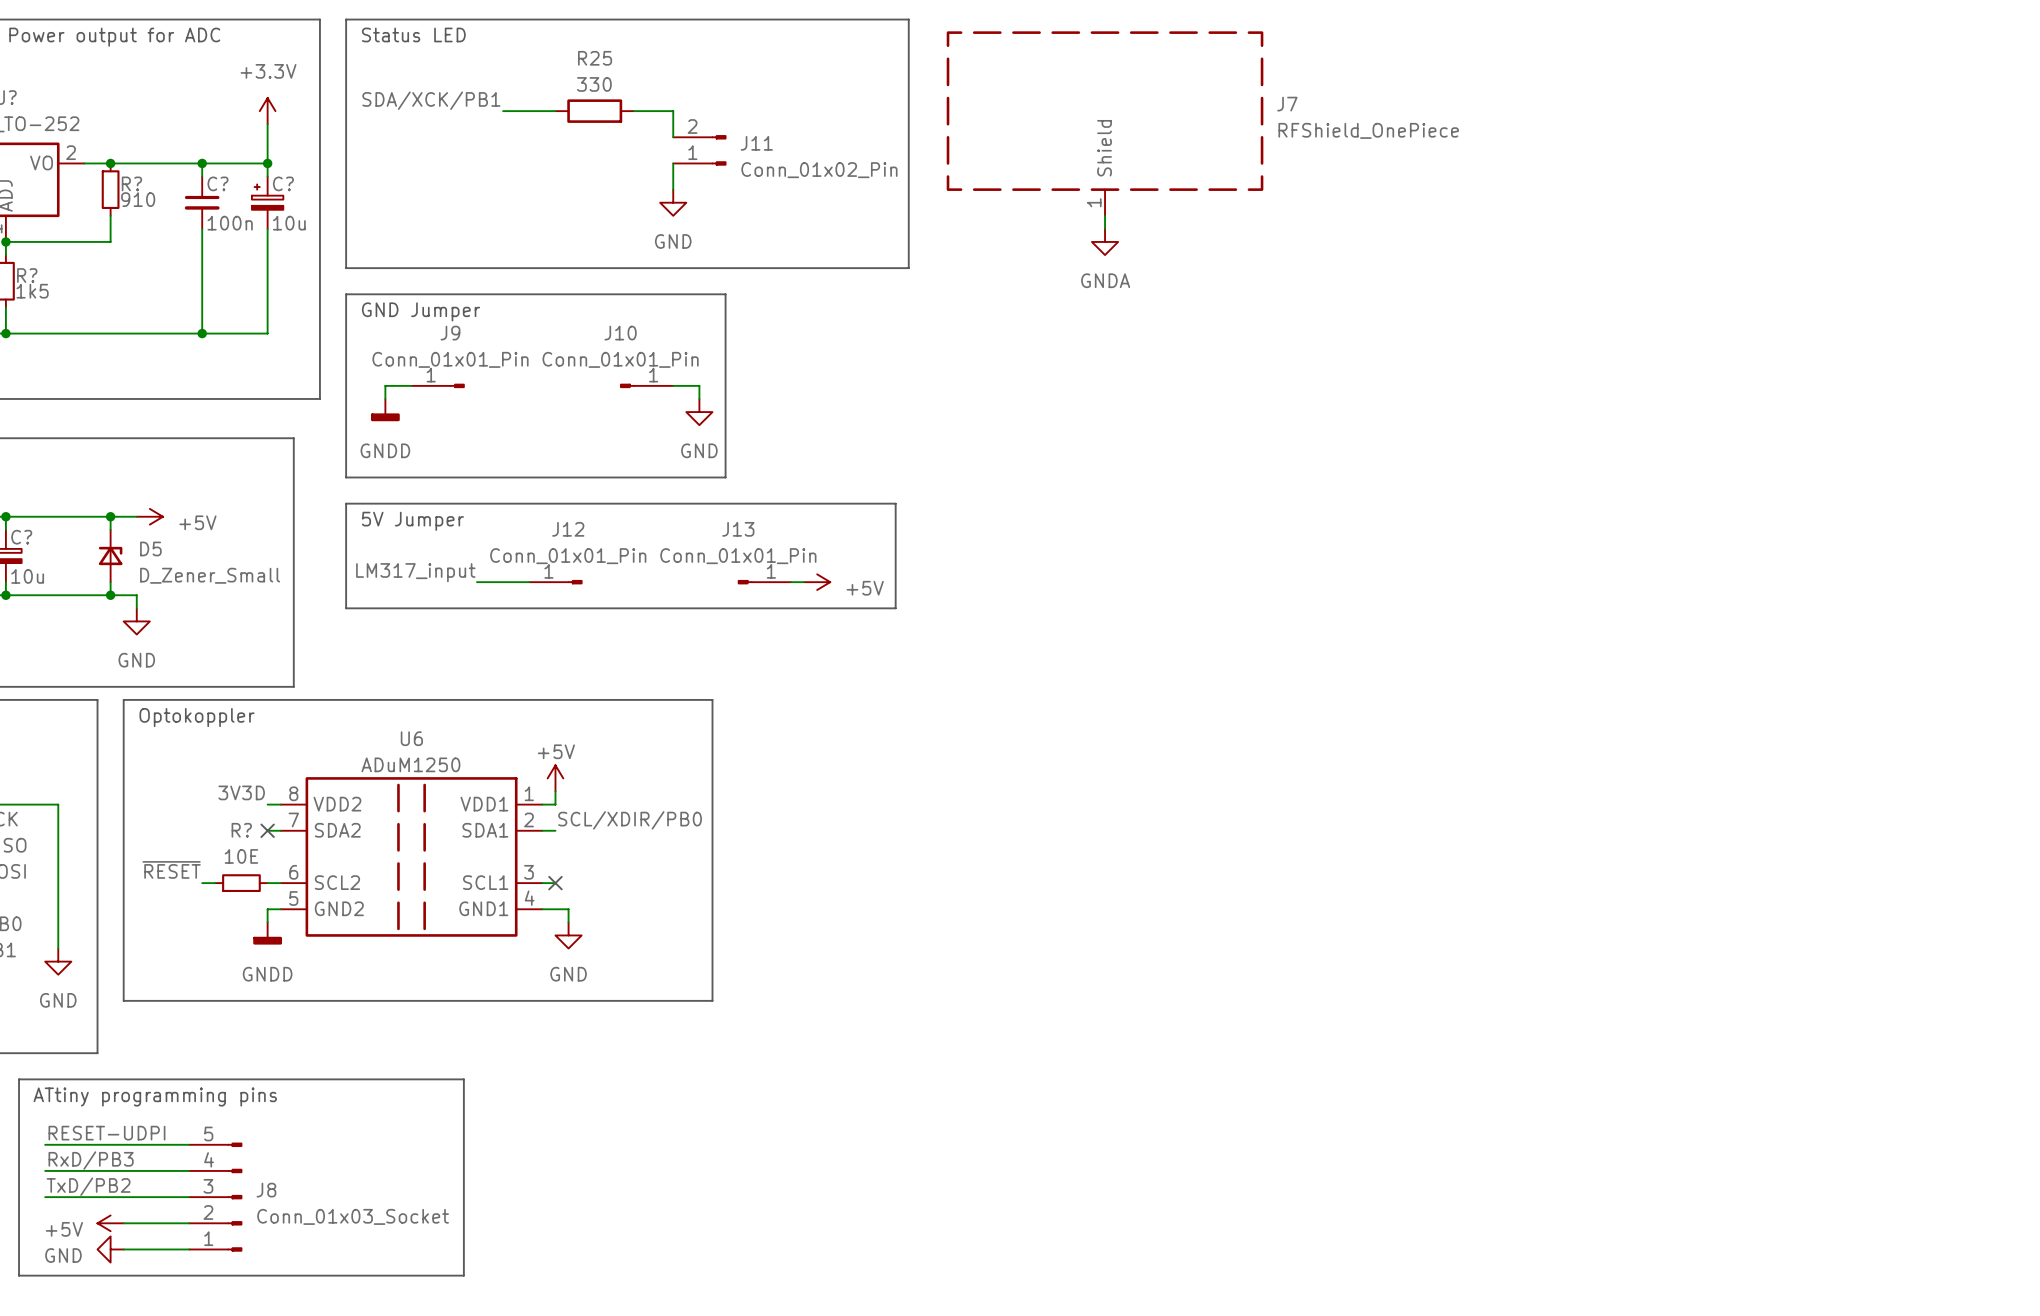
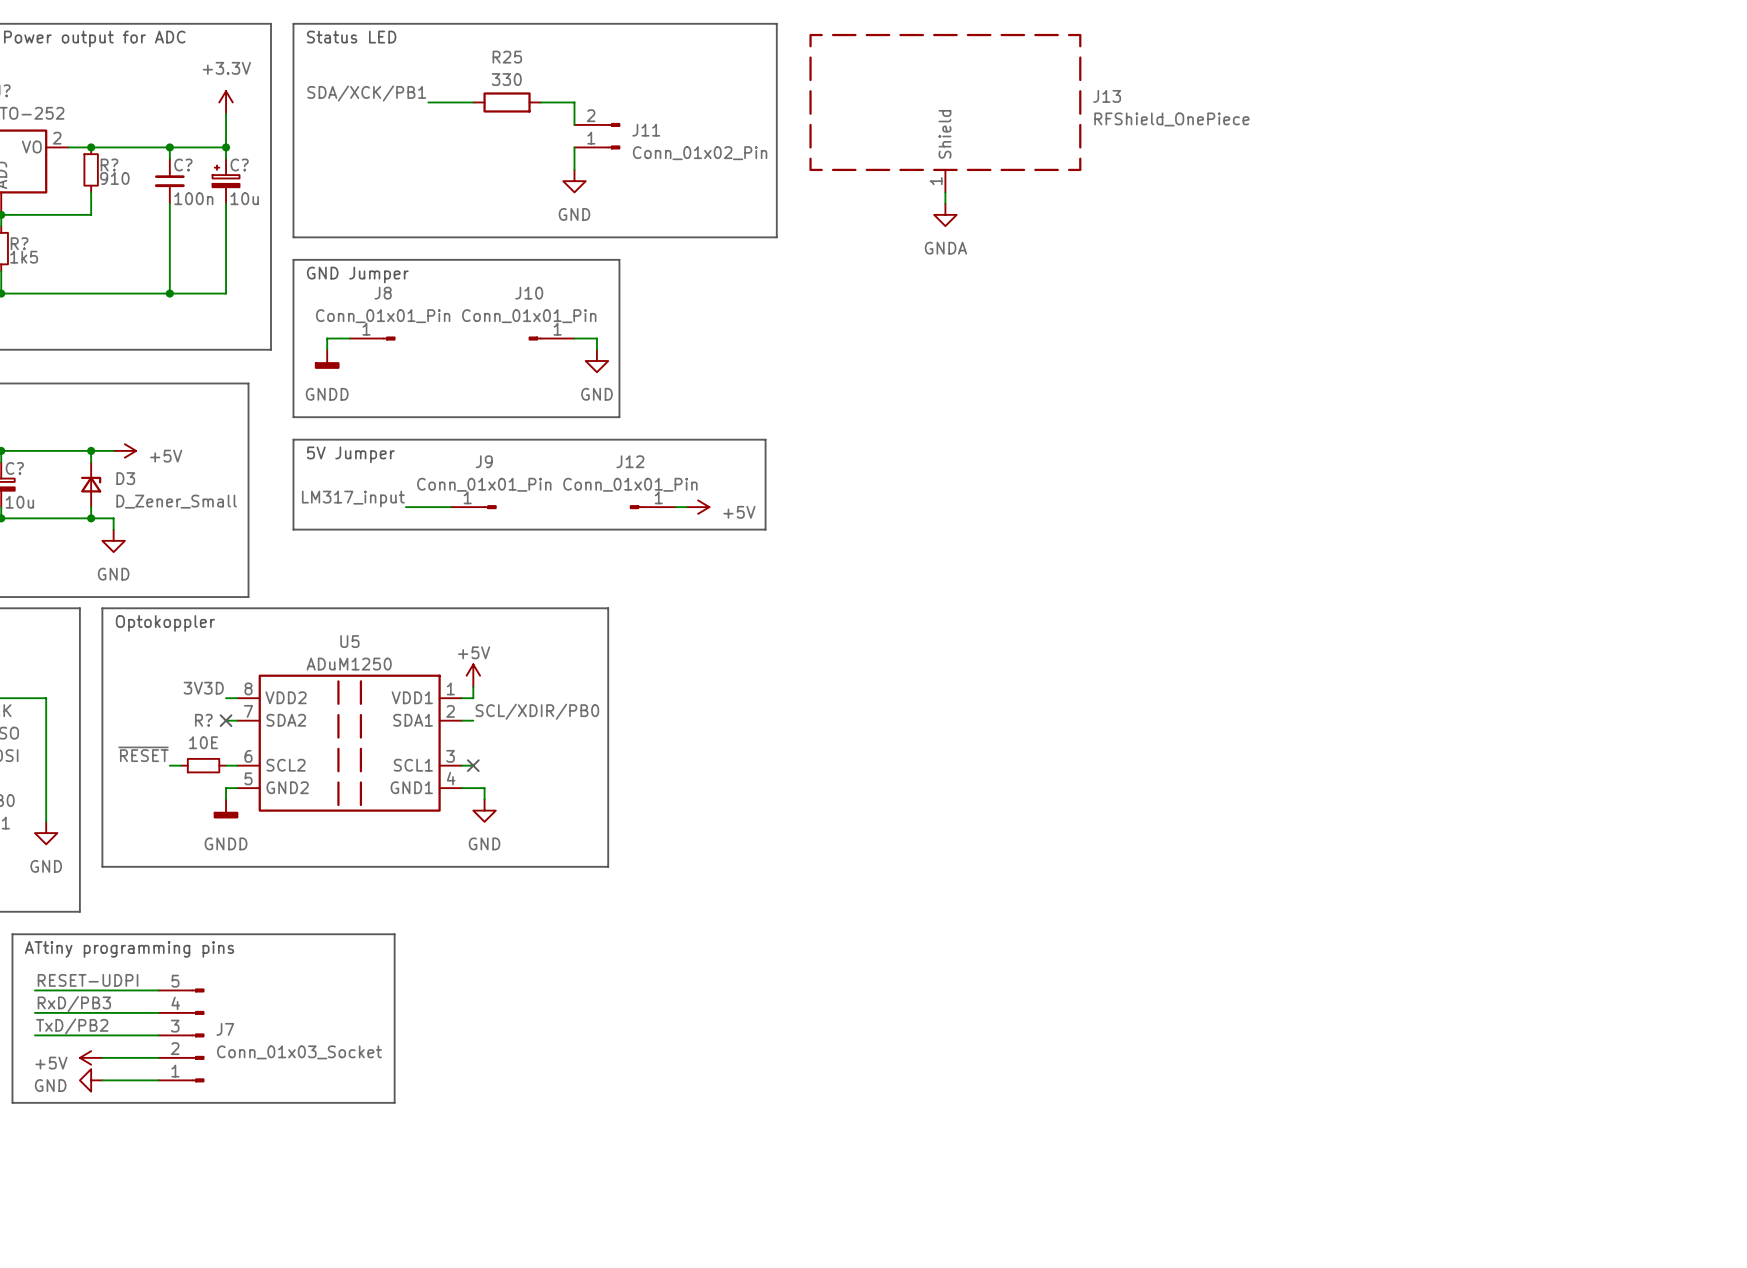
J7 name: J7 (1287, 104) -> J13 (1107, 96)
J9 name: J9 (450, 333) -> J8 (383, 293)
J12 name: J12 (568, 529) -> J9 (484, 461)
J13 name: J13 (738, 529) -> J12 (630, 461)
D5 name: D5 (150, 548) -> D3 (125, 478)
U6 name: U6 (411, 738) -> U5 (349, 641)
J8 name: J8 (266, 1190) -> J7 (225, 1029)

